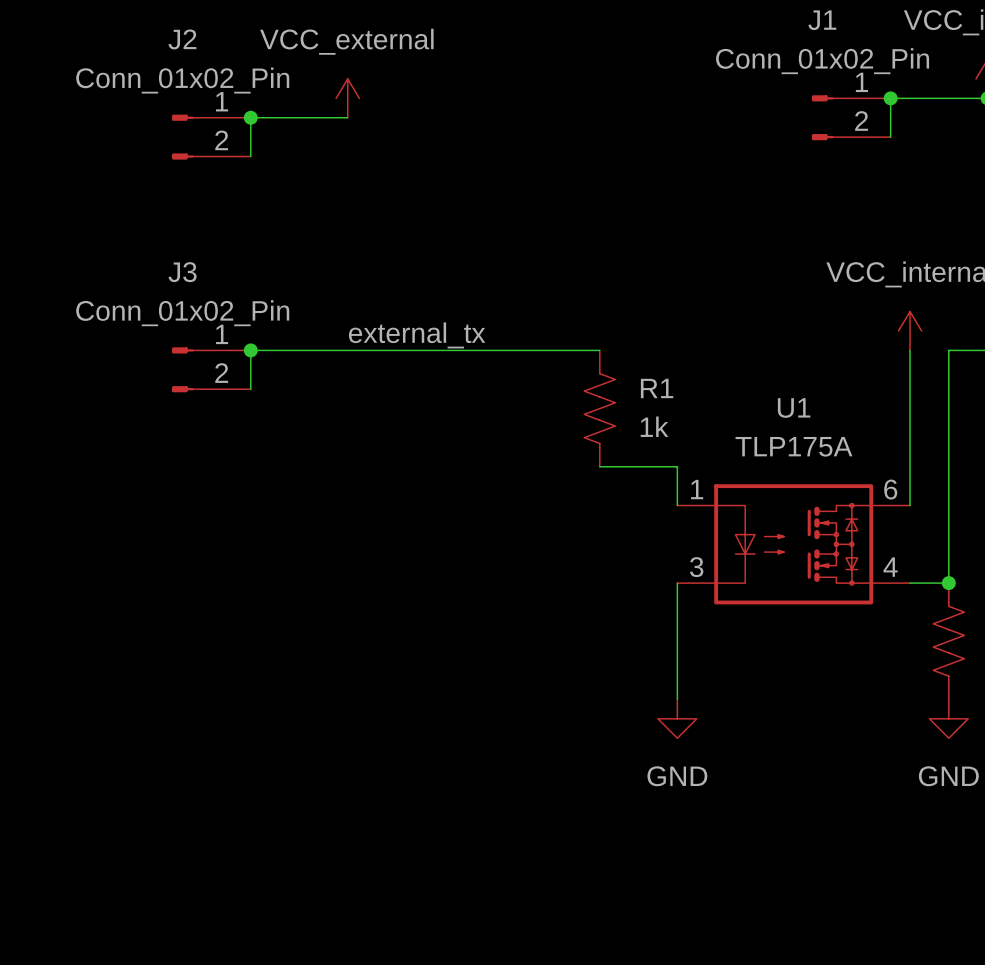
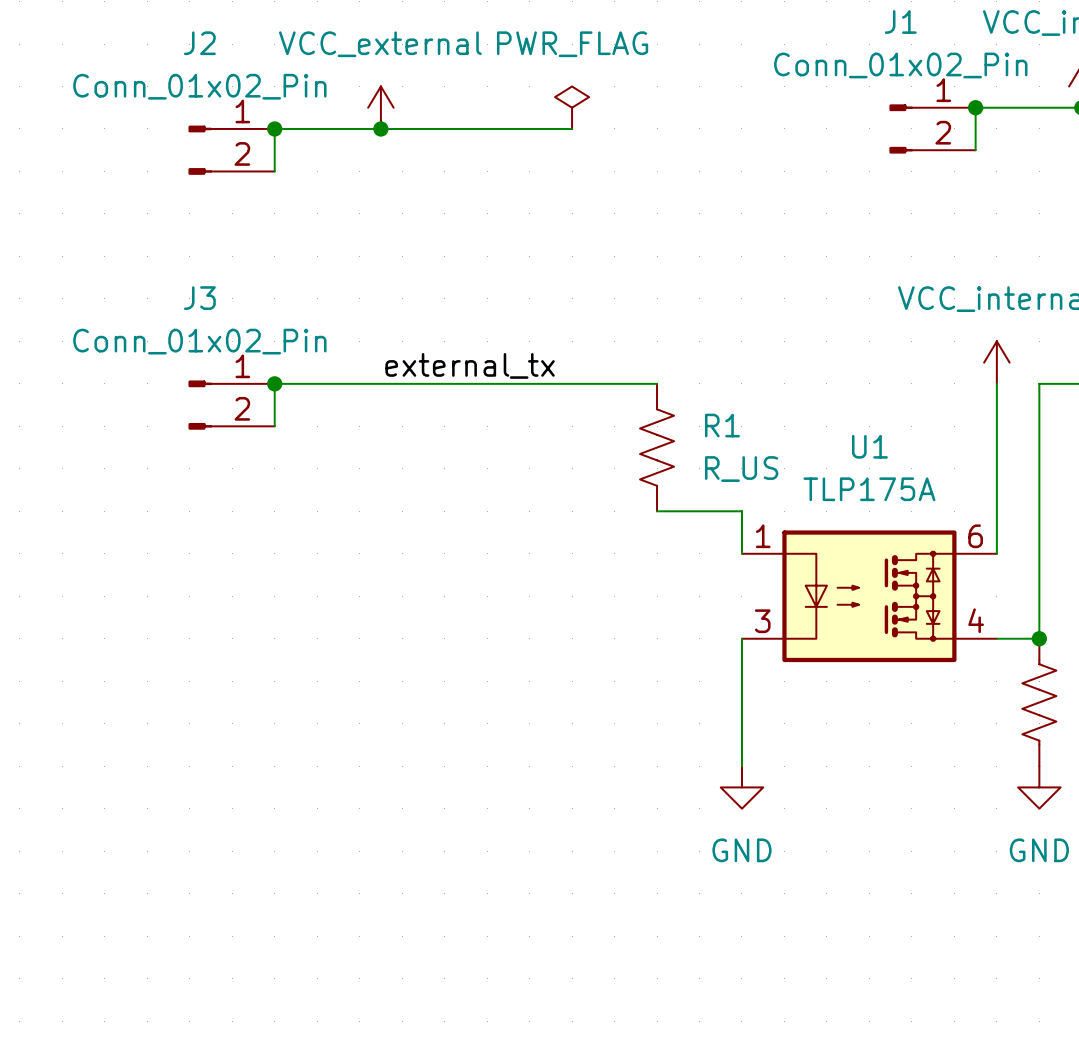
power symbol: none -> PWR_FLAG (572, 107)
wire: none -> (380, 128) (572, 128)
junction: none -> (380, 128)
R1 value: 1k (654, 426) -> R_US (741, 469)

